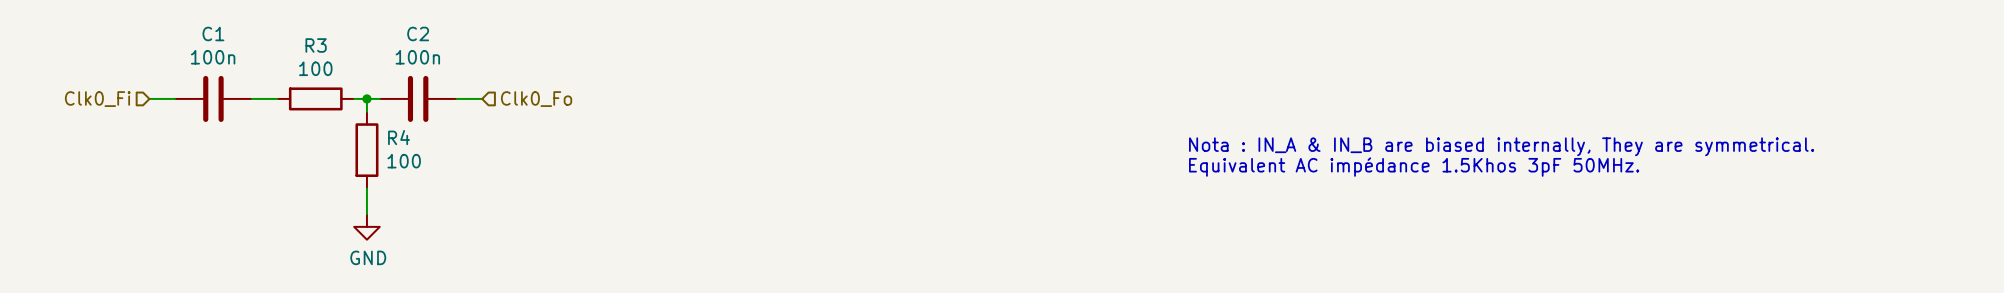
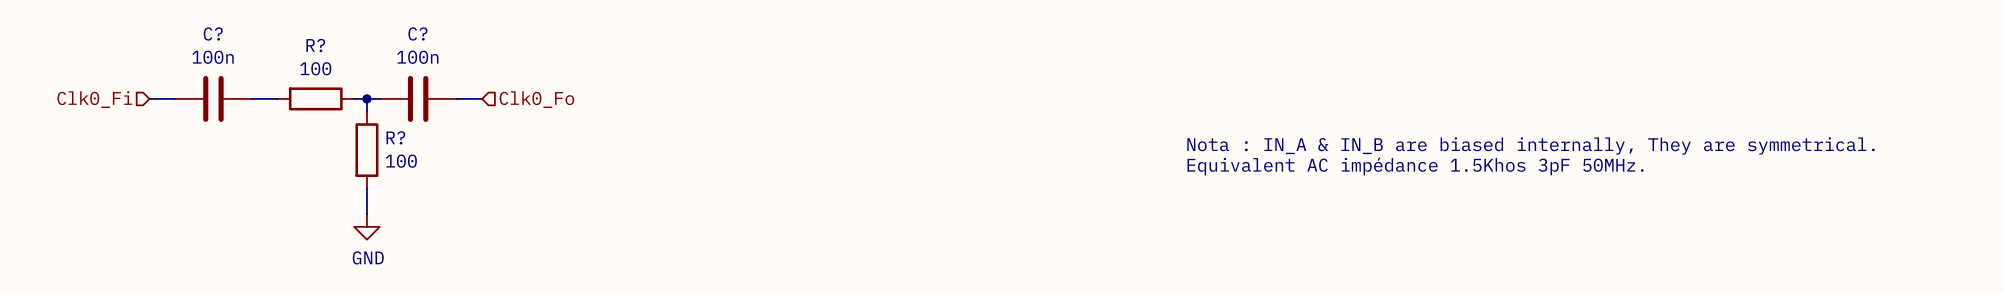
C1 name: C1 (213, 33) -> C? (213, 33)
C2 name: C2 (418, 33) -> C? (417, 33)
R3 name: R3 (316, 45) -> R? (315, 45)
R4 name: R4 (398, 137) -> R? (395, 137)

